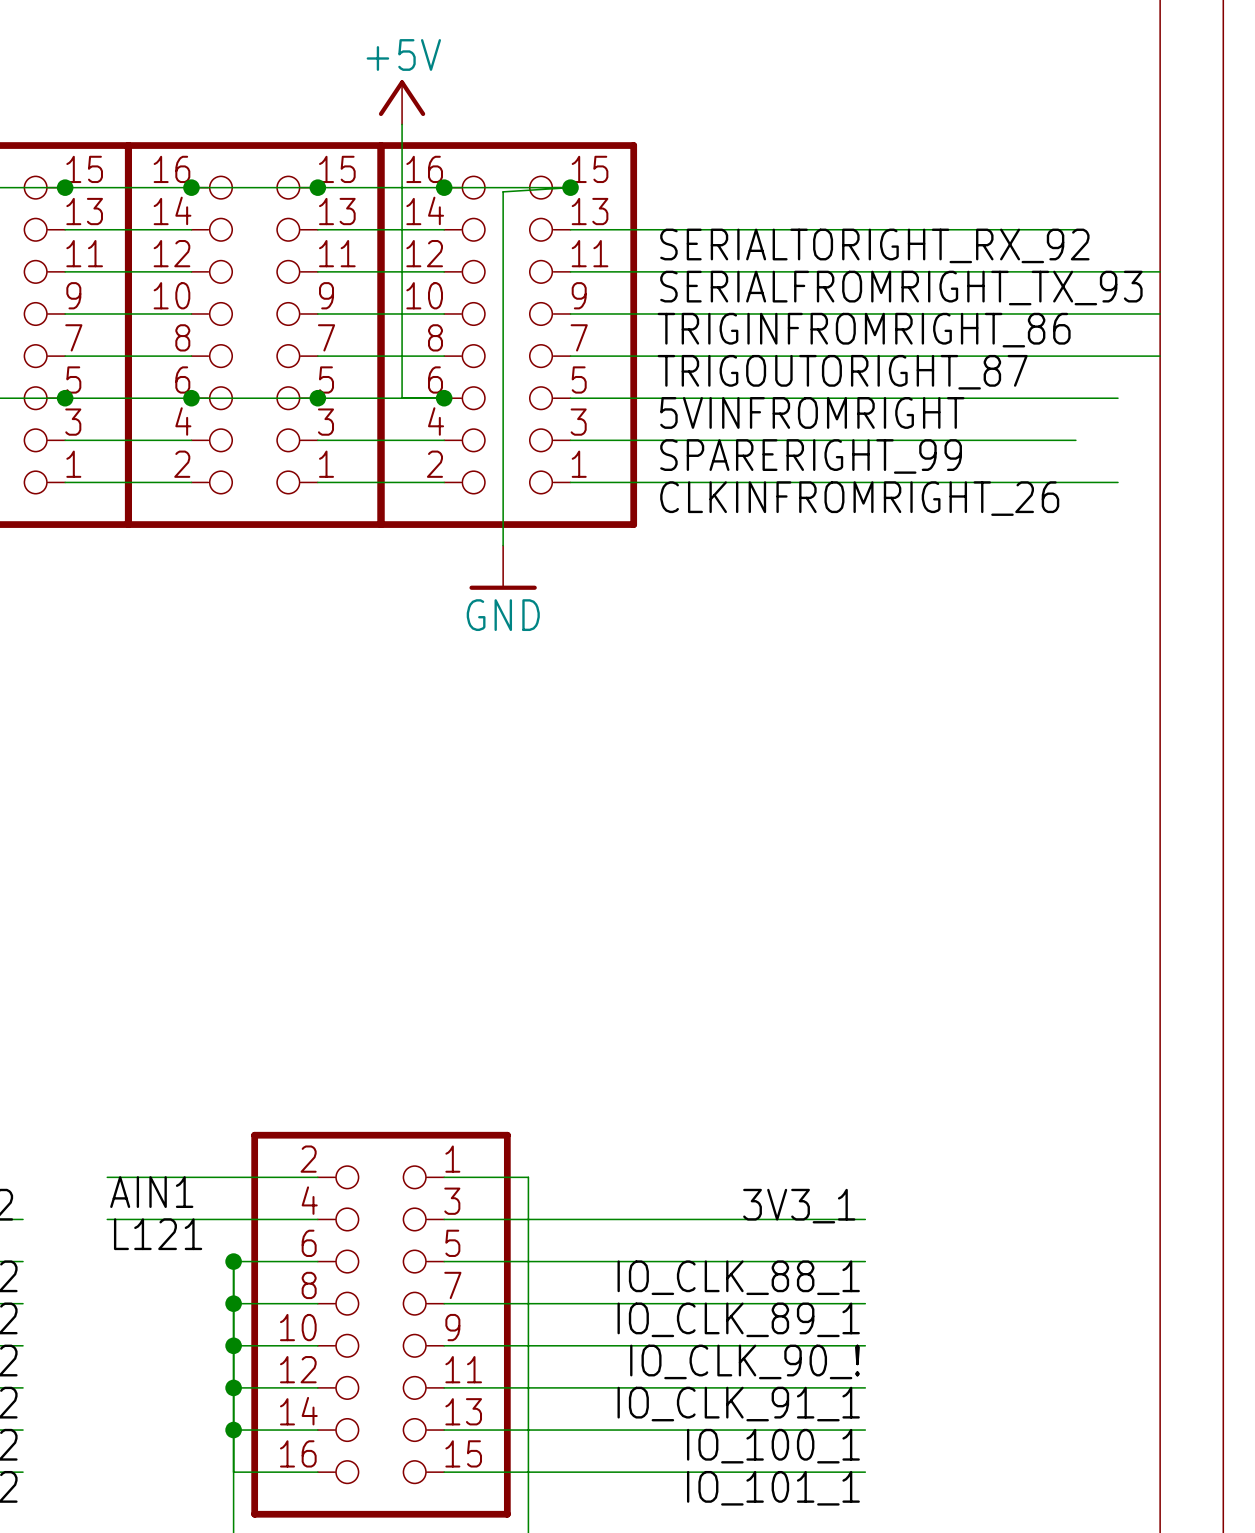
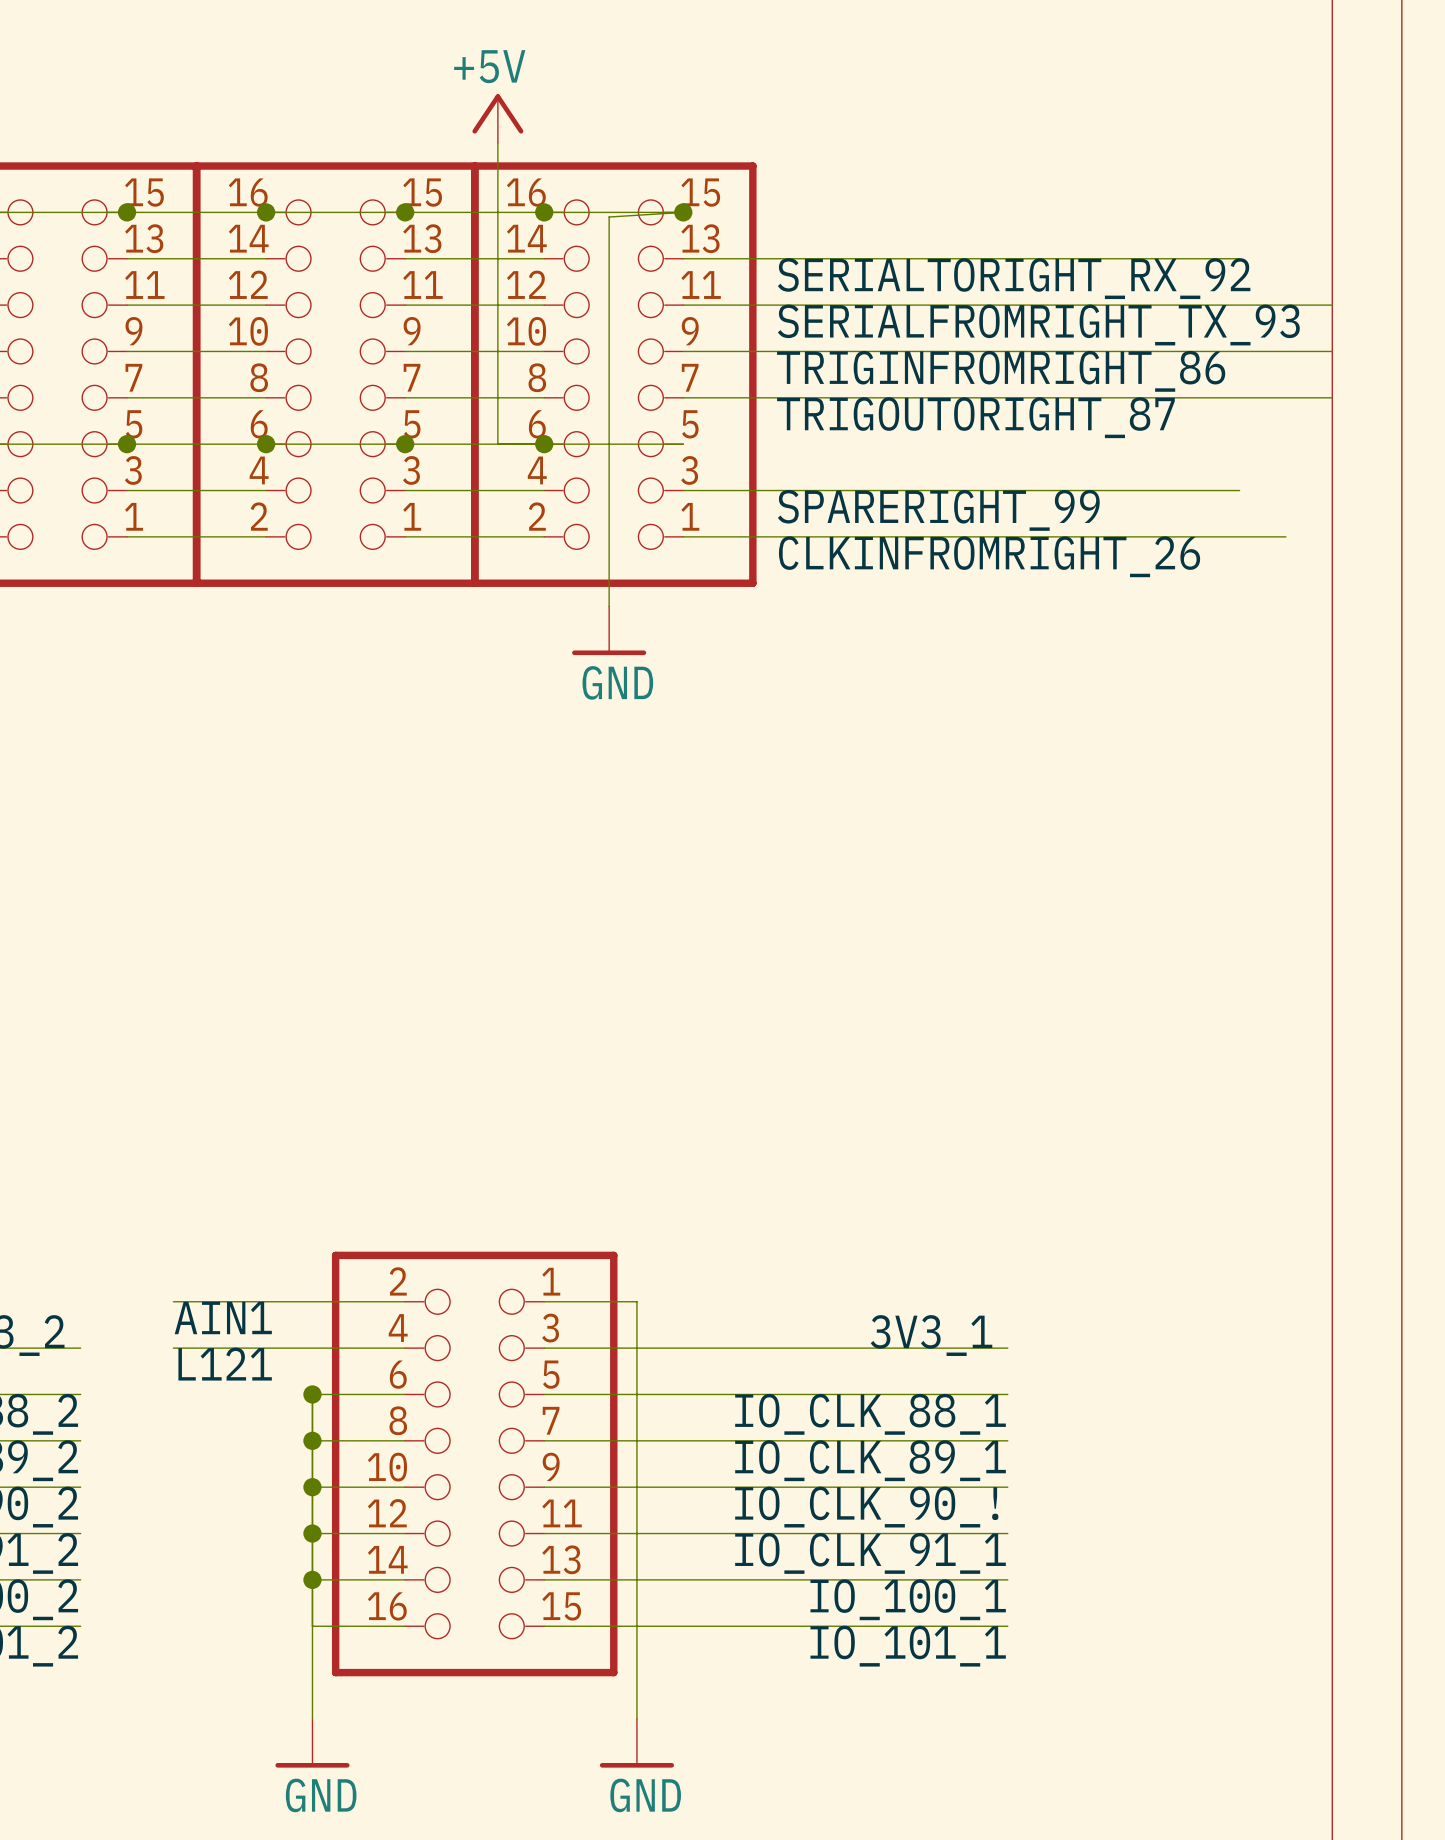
wire: (570, 398) (1118, 398) -> (683, 444) (544, 444)
label: 5VINFROMRIGHT (812, 412) -> none

